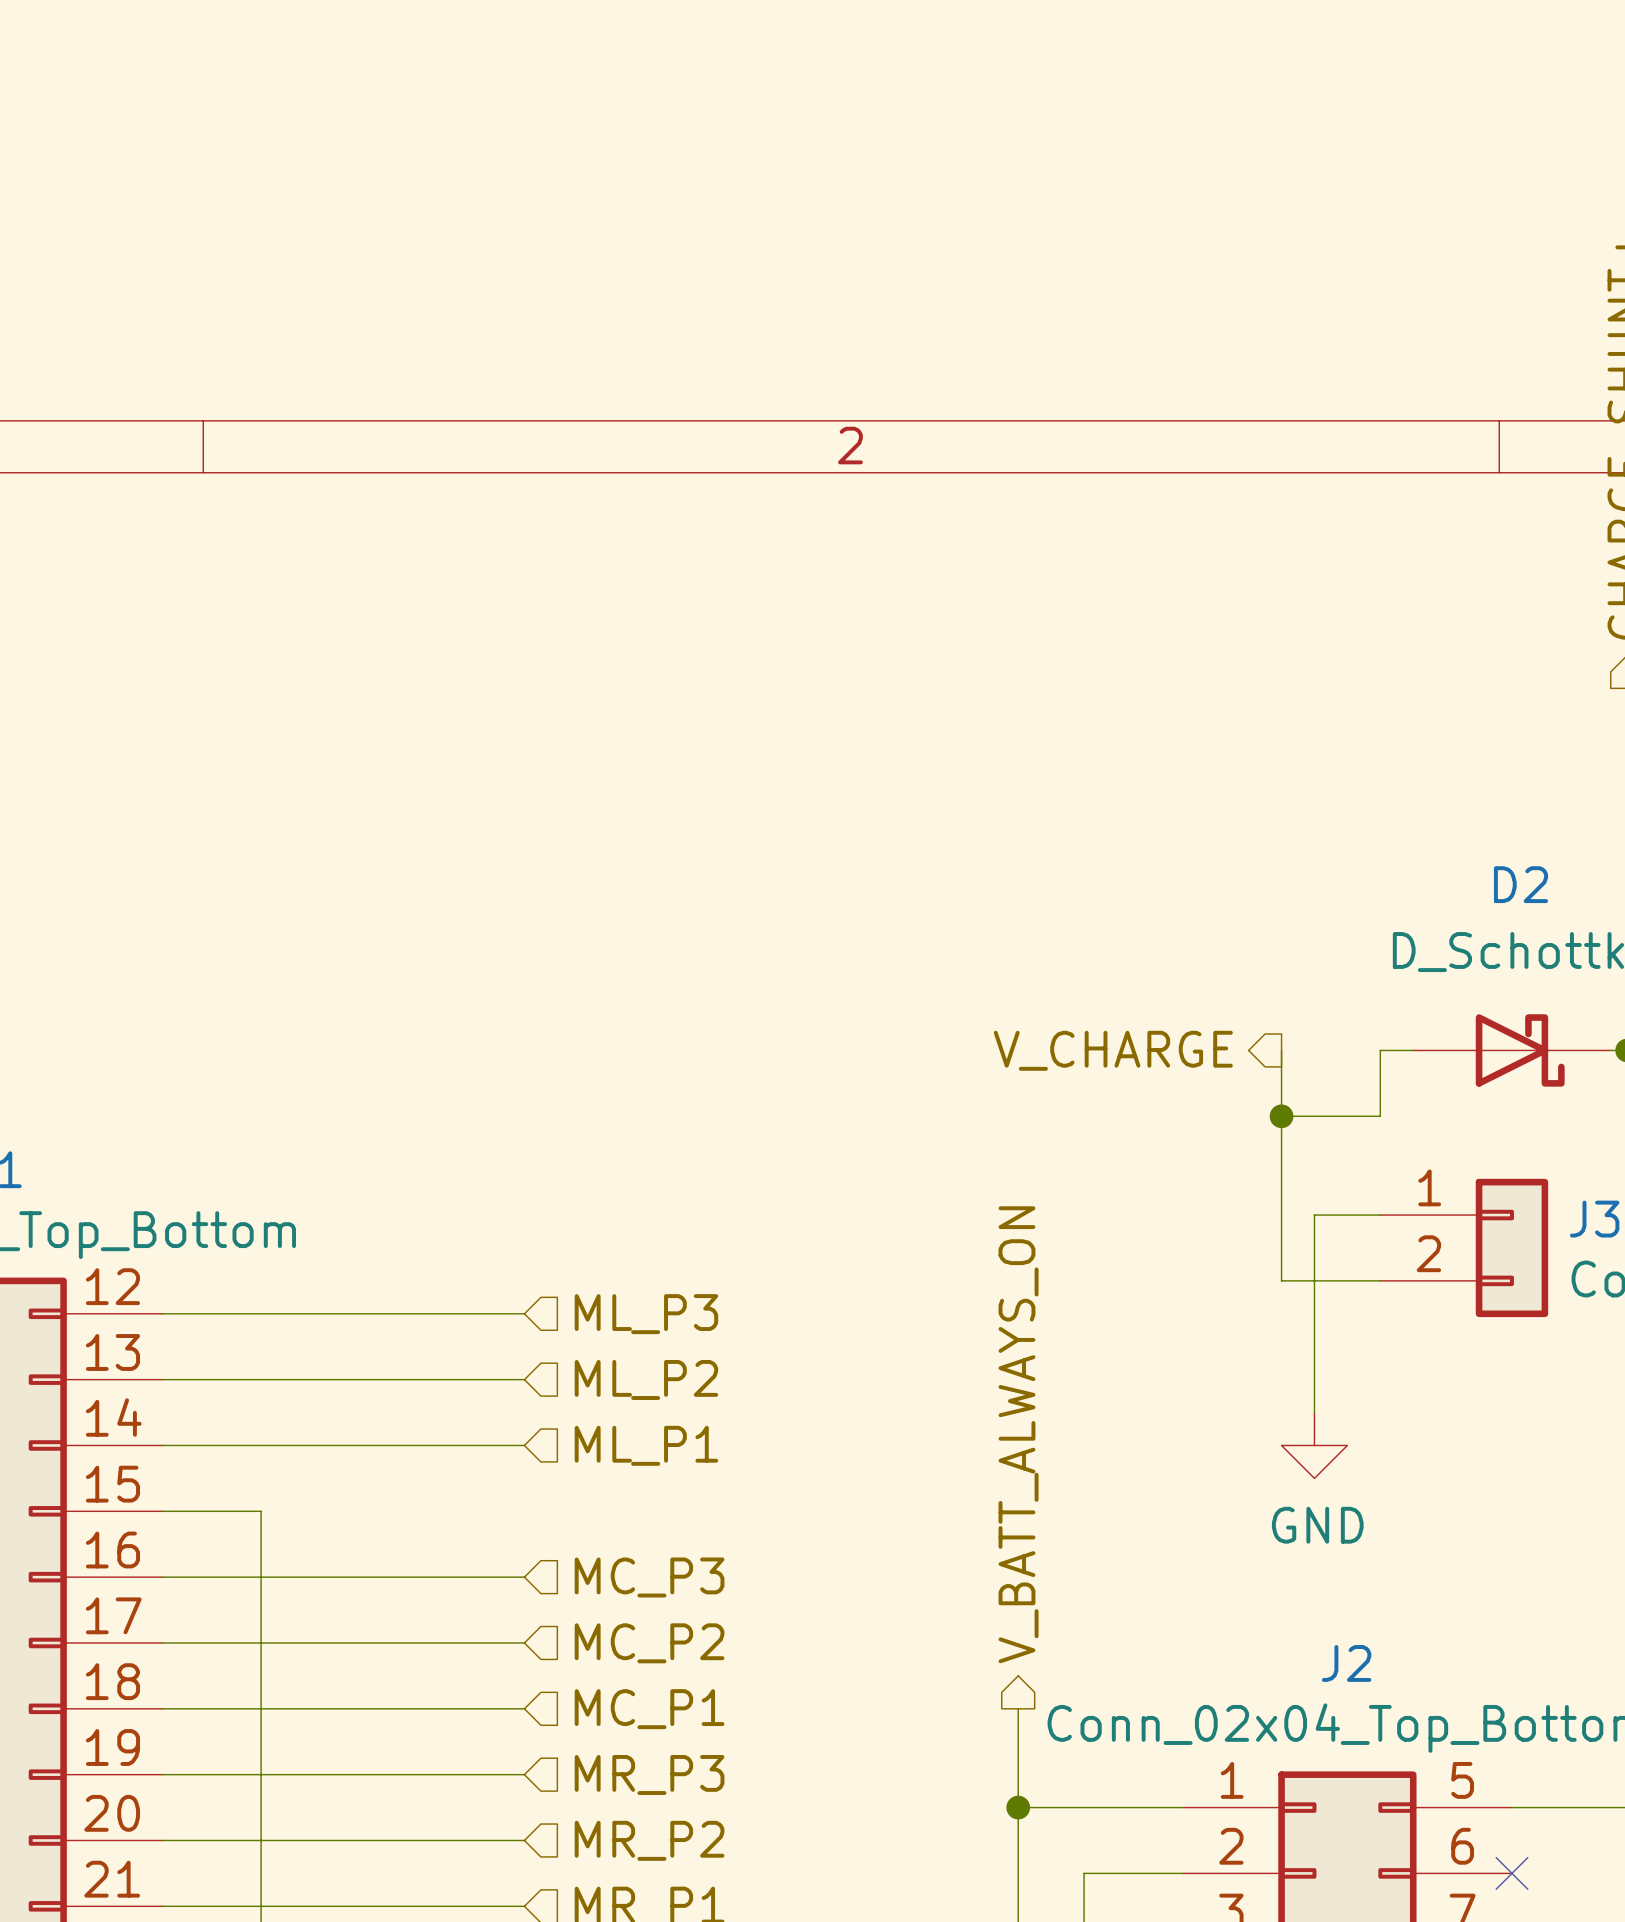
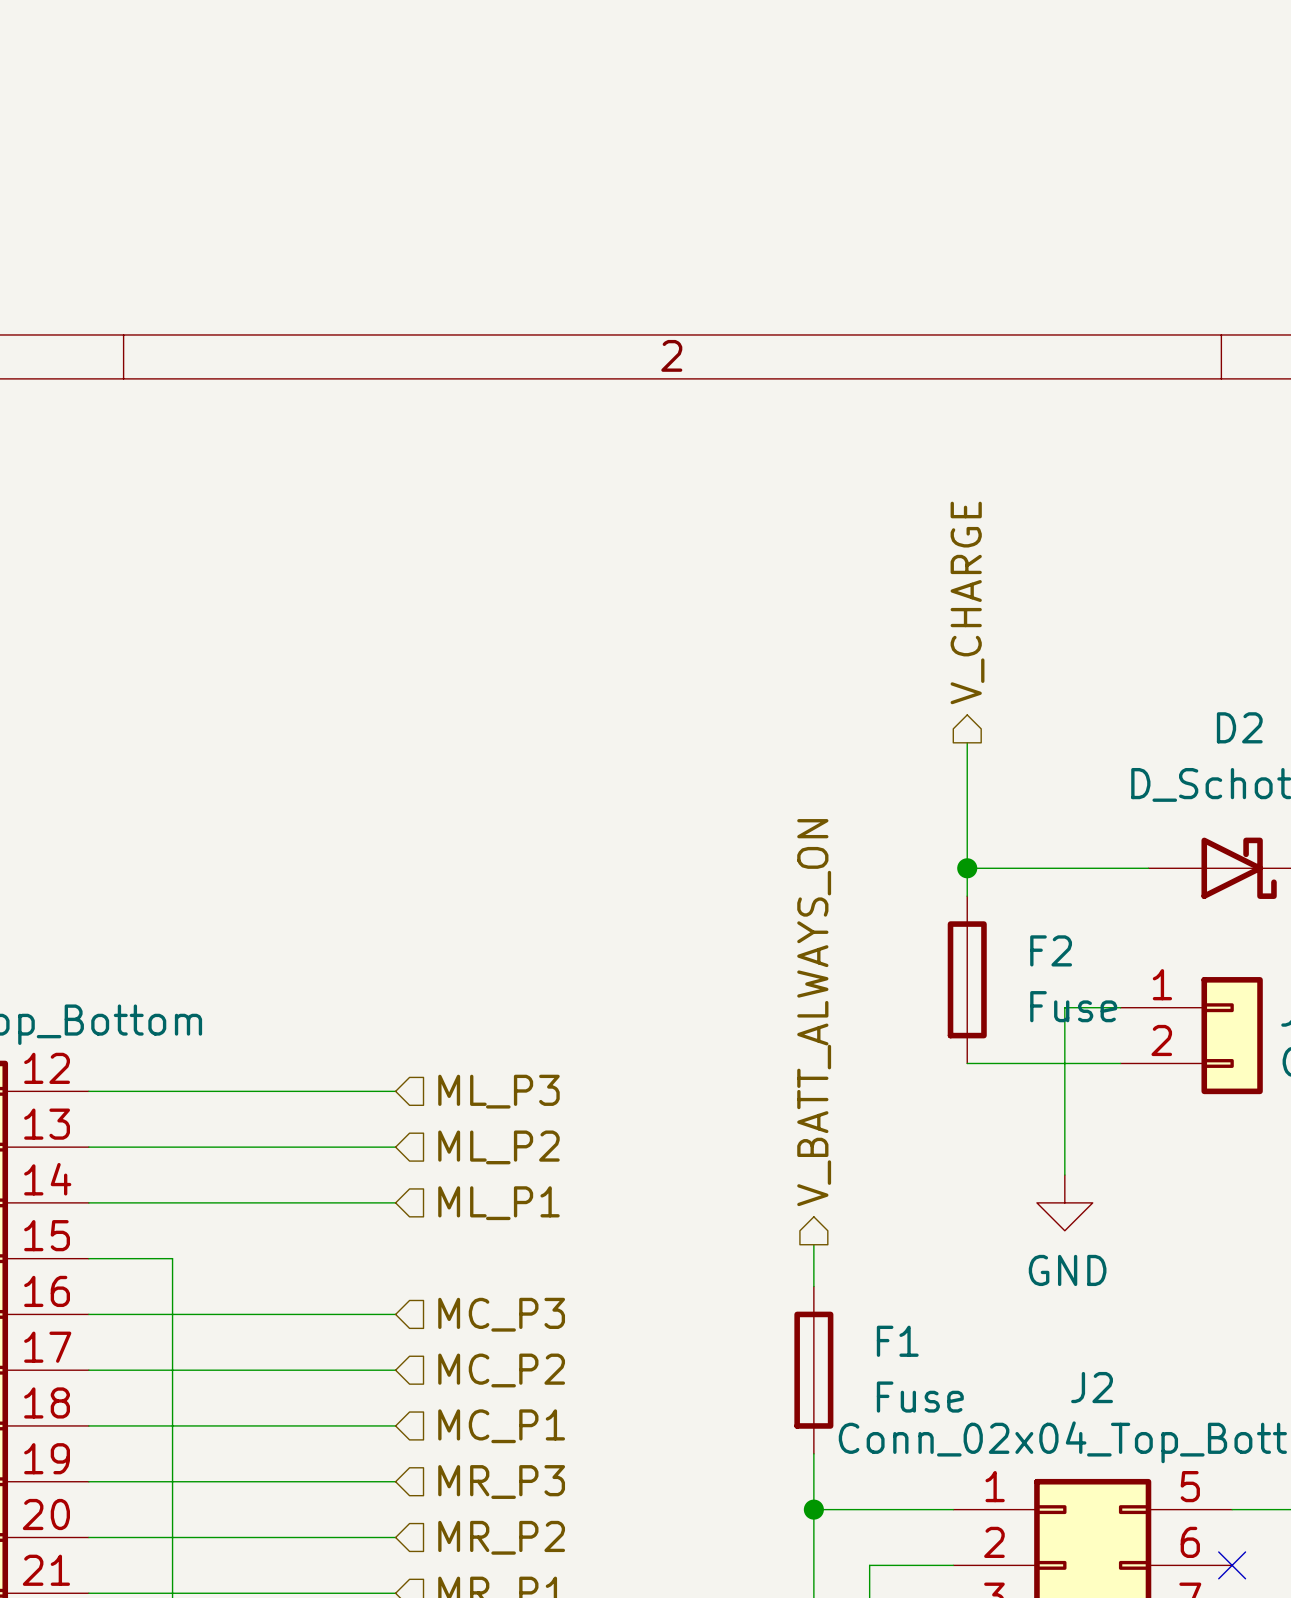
wire: none -> (967, 742) (967, 896)
hierarchical label rotation: 0° (1113, 1050) -> 90° clockwise (967, 602)
hierarchical label position: V_CHARGE (1113, 1050) -> V_CHARGE (967, 602)
wire: (1281, 1050) (1281, 1280) -> (967, 1063) (1036, 1063)
wire: (1380, 1050) (1380, 1116) (1281, 1116) -> (1120, 868) (967, 868)
junction position: (1281, 1116) -> (967, 868)
F2: none -> Fuse (967, 979)
hierarchical label position: V_BATT_ALWAYS_ON (1018, 1434) -> V_BATT_ALWAYS_ON (814, 1012)
wire: none -> (813, 1244) (813, 1286)
F1: none -> Fuse (813, 1370)

